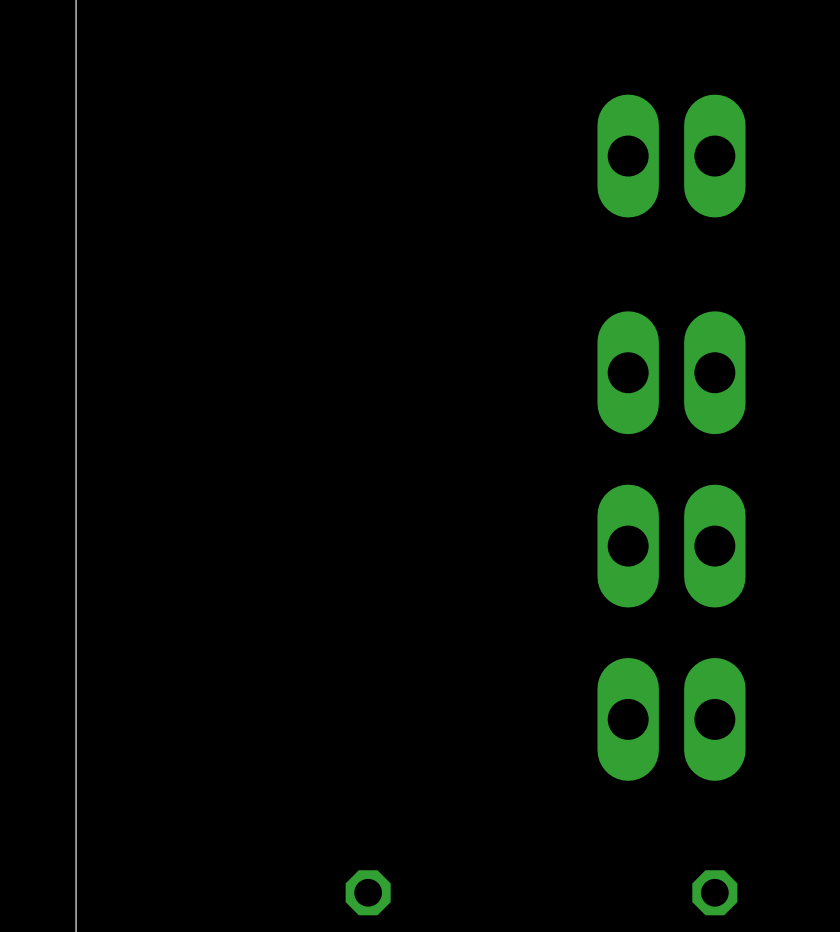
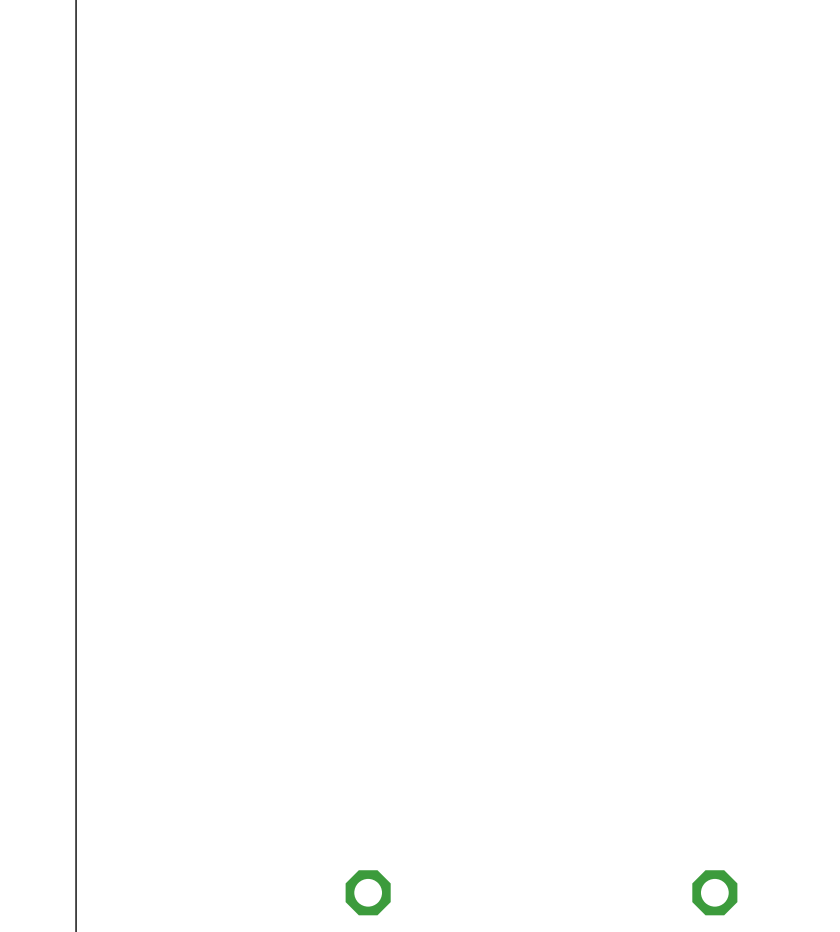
part: (671, 156) -> none
part: (671, 372) -> none
part: (671, 546) -> none
part: (671, 719) -> none

